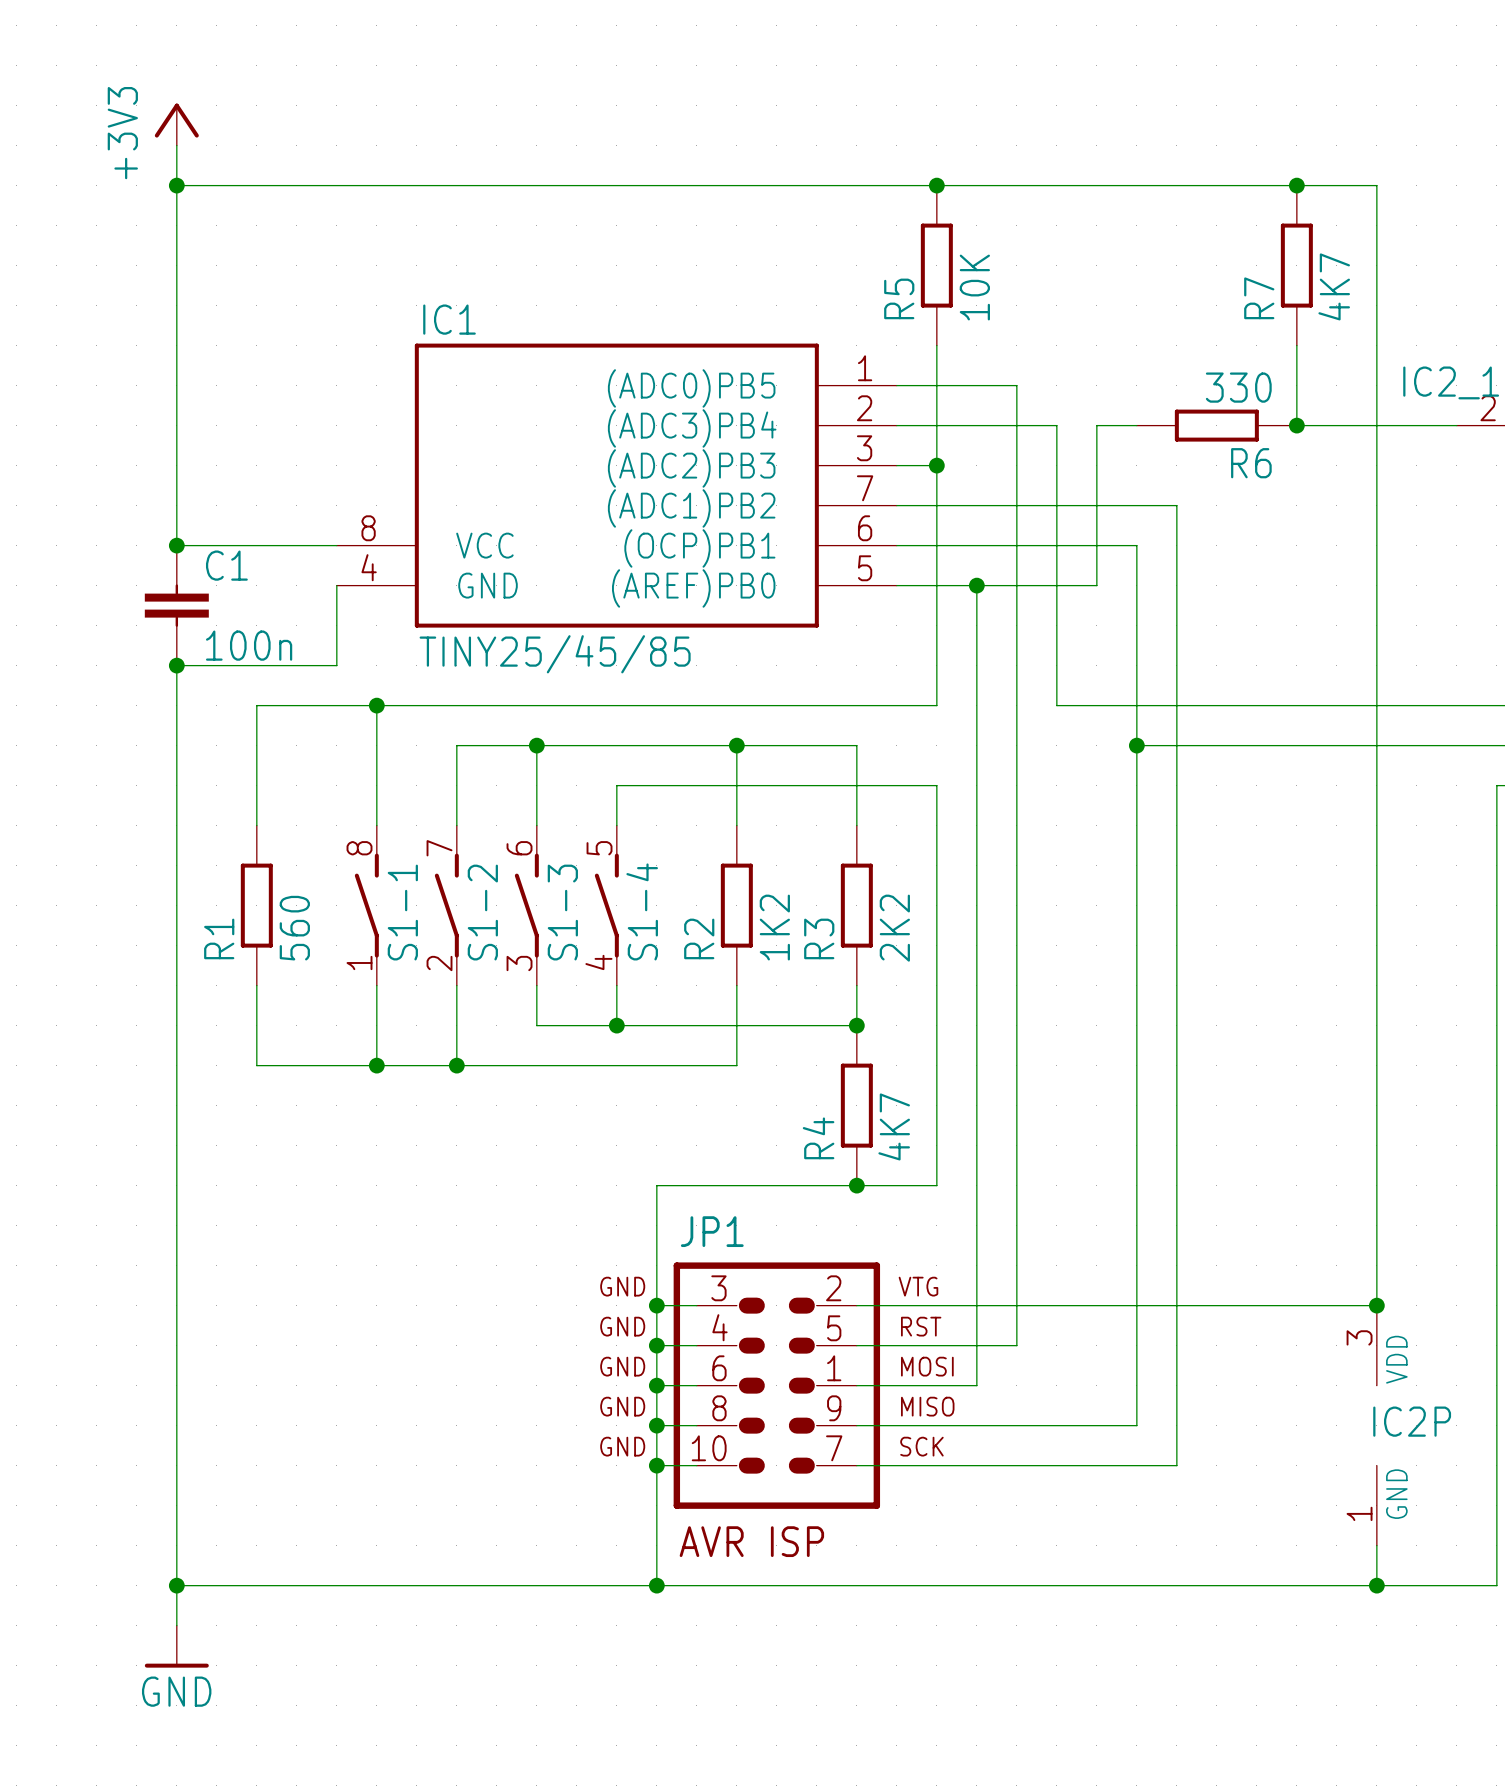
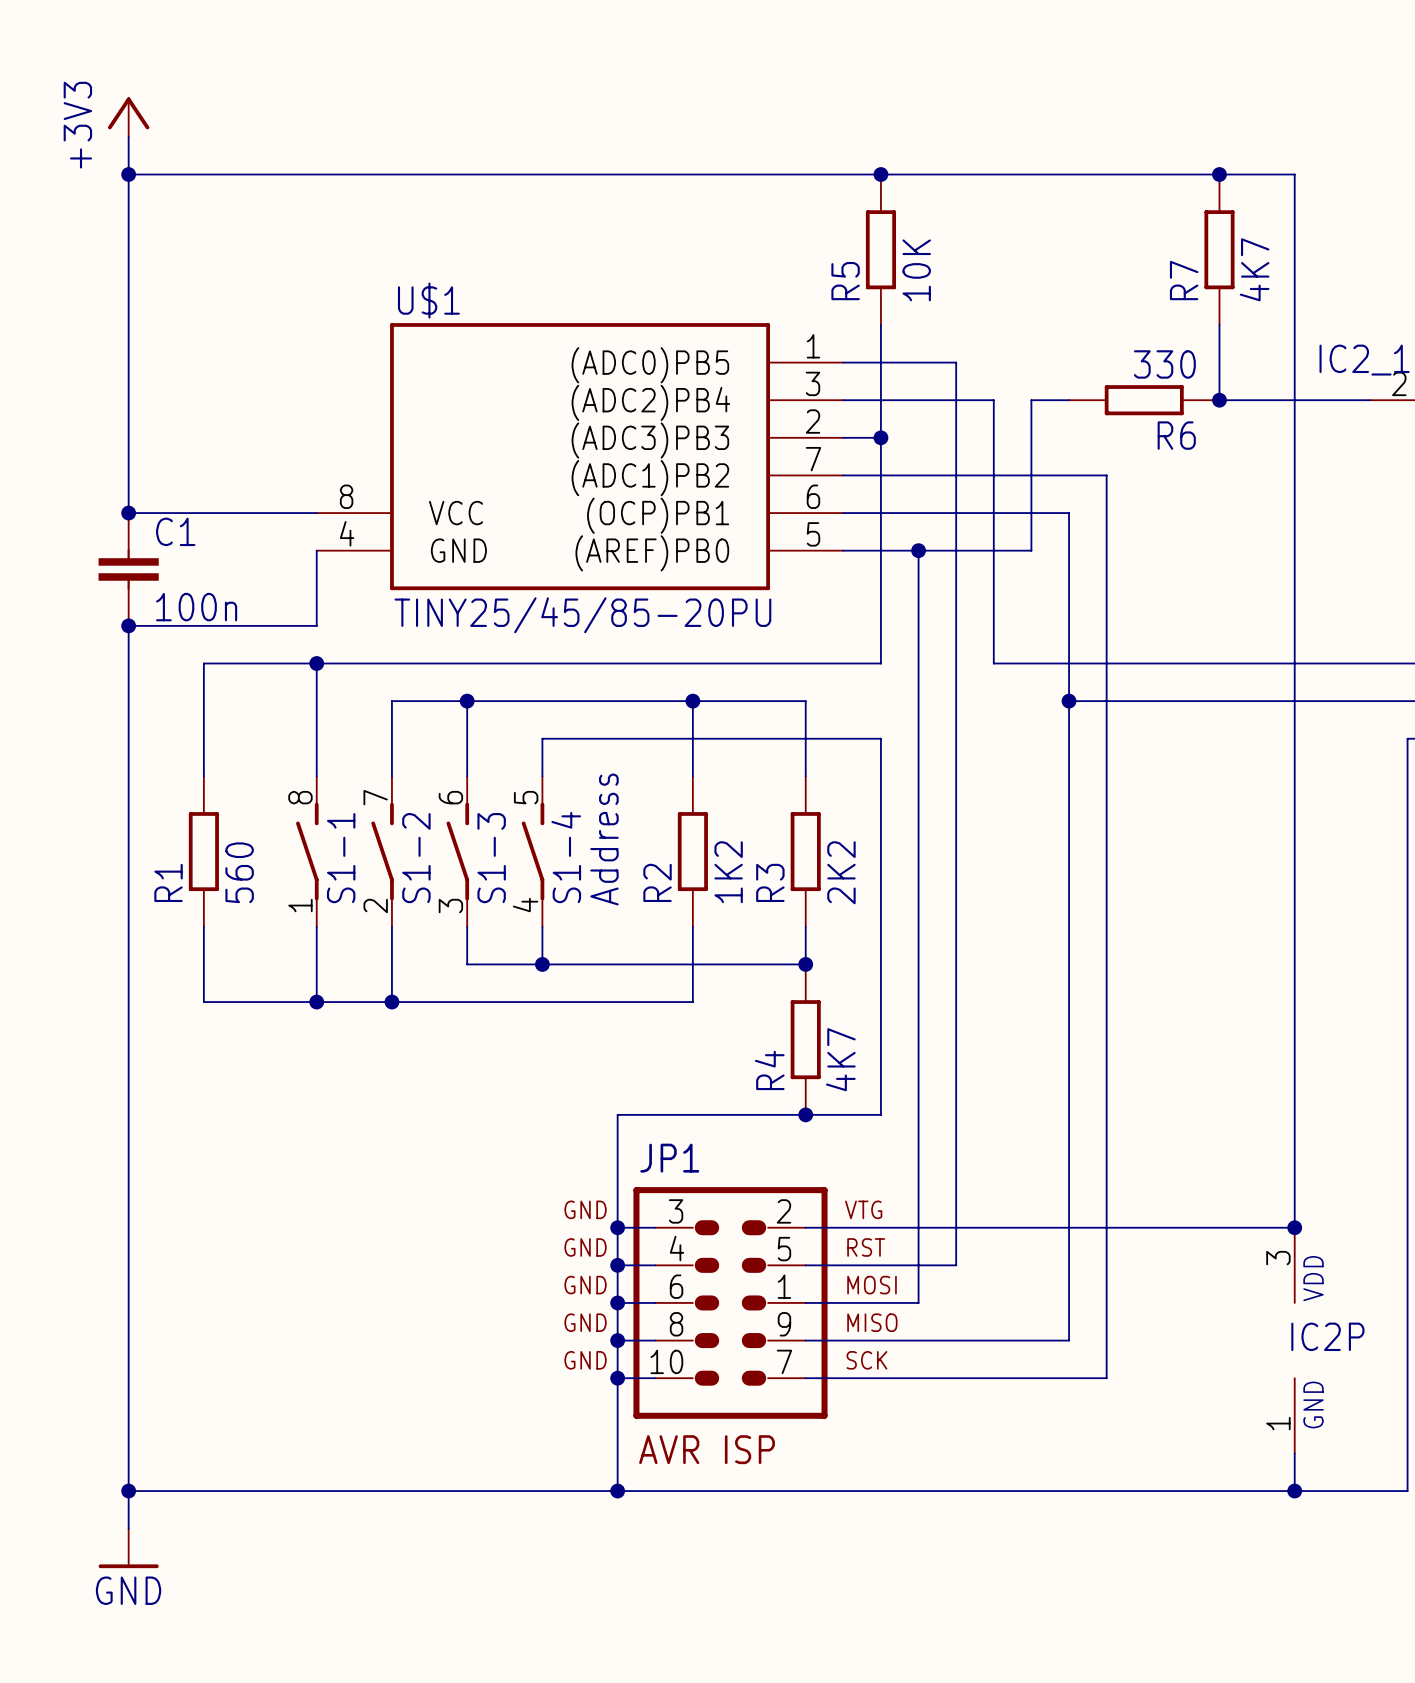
power symbol position: +3V3 (176, 124) -> +3V3 (128, 117)
wire: (176, 145) (176, 545) -> (128, 136) (128, 513) (166, 513)
wire: none -> (128, 174) (166, 174)
junction position: (176, 185) -> (128, 174)
IC1 name: IC1 (449, 319) -> U$1 (428, 300)
IC1 pin number: 2 (864, 408) -> 3 (812, 383)
IC1 pin name: (ADC3)PB4 (692, 428) -> (ADC2)PB4 (650, 402)
IC1 pin number: 3 (864, 448) -> 2 (812, 421)
IC1 pin name: (ADC2)PB3 (691, 468) -> (ADC3)PB3 (650, 440)
junction position: (176, 545) -> (128, 513)
C1 position: (176, 605) -> (128, 569)
IC1 value: TINY25/45/85 (555, 654) -> TINY25/45/85-20PU (582, 615)
wire: (176, 665) (176, 1625) -> (166, 625) (128, 625) (128, 1528)
junction position: (176, 665) -> (128, 625)
wire: (256, 705) (256, 825) -> (241, 663) (203, 663) (203, 776)
wire: (376, 705) (376, 825) -> (316, 663) (316, 776)
junction position: (376, 705) -> (316, 663)
wire: (456, 745) (456, 825) -> (429, 701) (391, 701) (391, 776)
wire: (536, 745) (536, 825) -> (467, 701) (467, 776)
junction position: (536, 745) -> (467, 701)
wire: (616, 785) (616, 825) -> (580, 738) (542, 738) (542, 776)
S1-4 value: none -> Address (604, 839)
R1 position: (256, 905) -> (203, 851)
S1-1 position: (366, 905) -> (307, 851)
S1-2 position: (446, 905) -> (382, 851)
S1-3 position: (526, 905) -> (457, 851)
S1-4 position: (606, 905) -> (533, 851)
wire: (256, 985) (256, 1065) -> (203, 926) (203, 1002) (241, 1002)
wire: (376, 985) (376, 1065) -> (316, 926) (316, 1002)
wire: (456, 985) (456, 1065) -> (391, 926) (391, 1002)
wire: (536, 985) (536, 1025) -> (467, 926) (467, 964) (504, 964)
wire: (616, 985) (616, 1025) -> (542, 926) (542, 964)
junction position: (616, 1025) -> (542, 964)
junction: none -> (316, 1002)
junction: (376, 1065) -> none
junction: none -> (391, 1002)
junction: (456, 1065) -> none
wire: none -> (128, 1491) (166, 1491)
junction position: (176, 1585) -> (128, 1491)
power symbol position: GND (176, 1646) -> GND (128, 1548)

